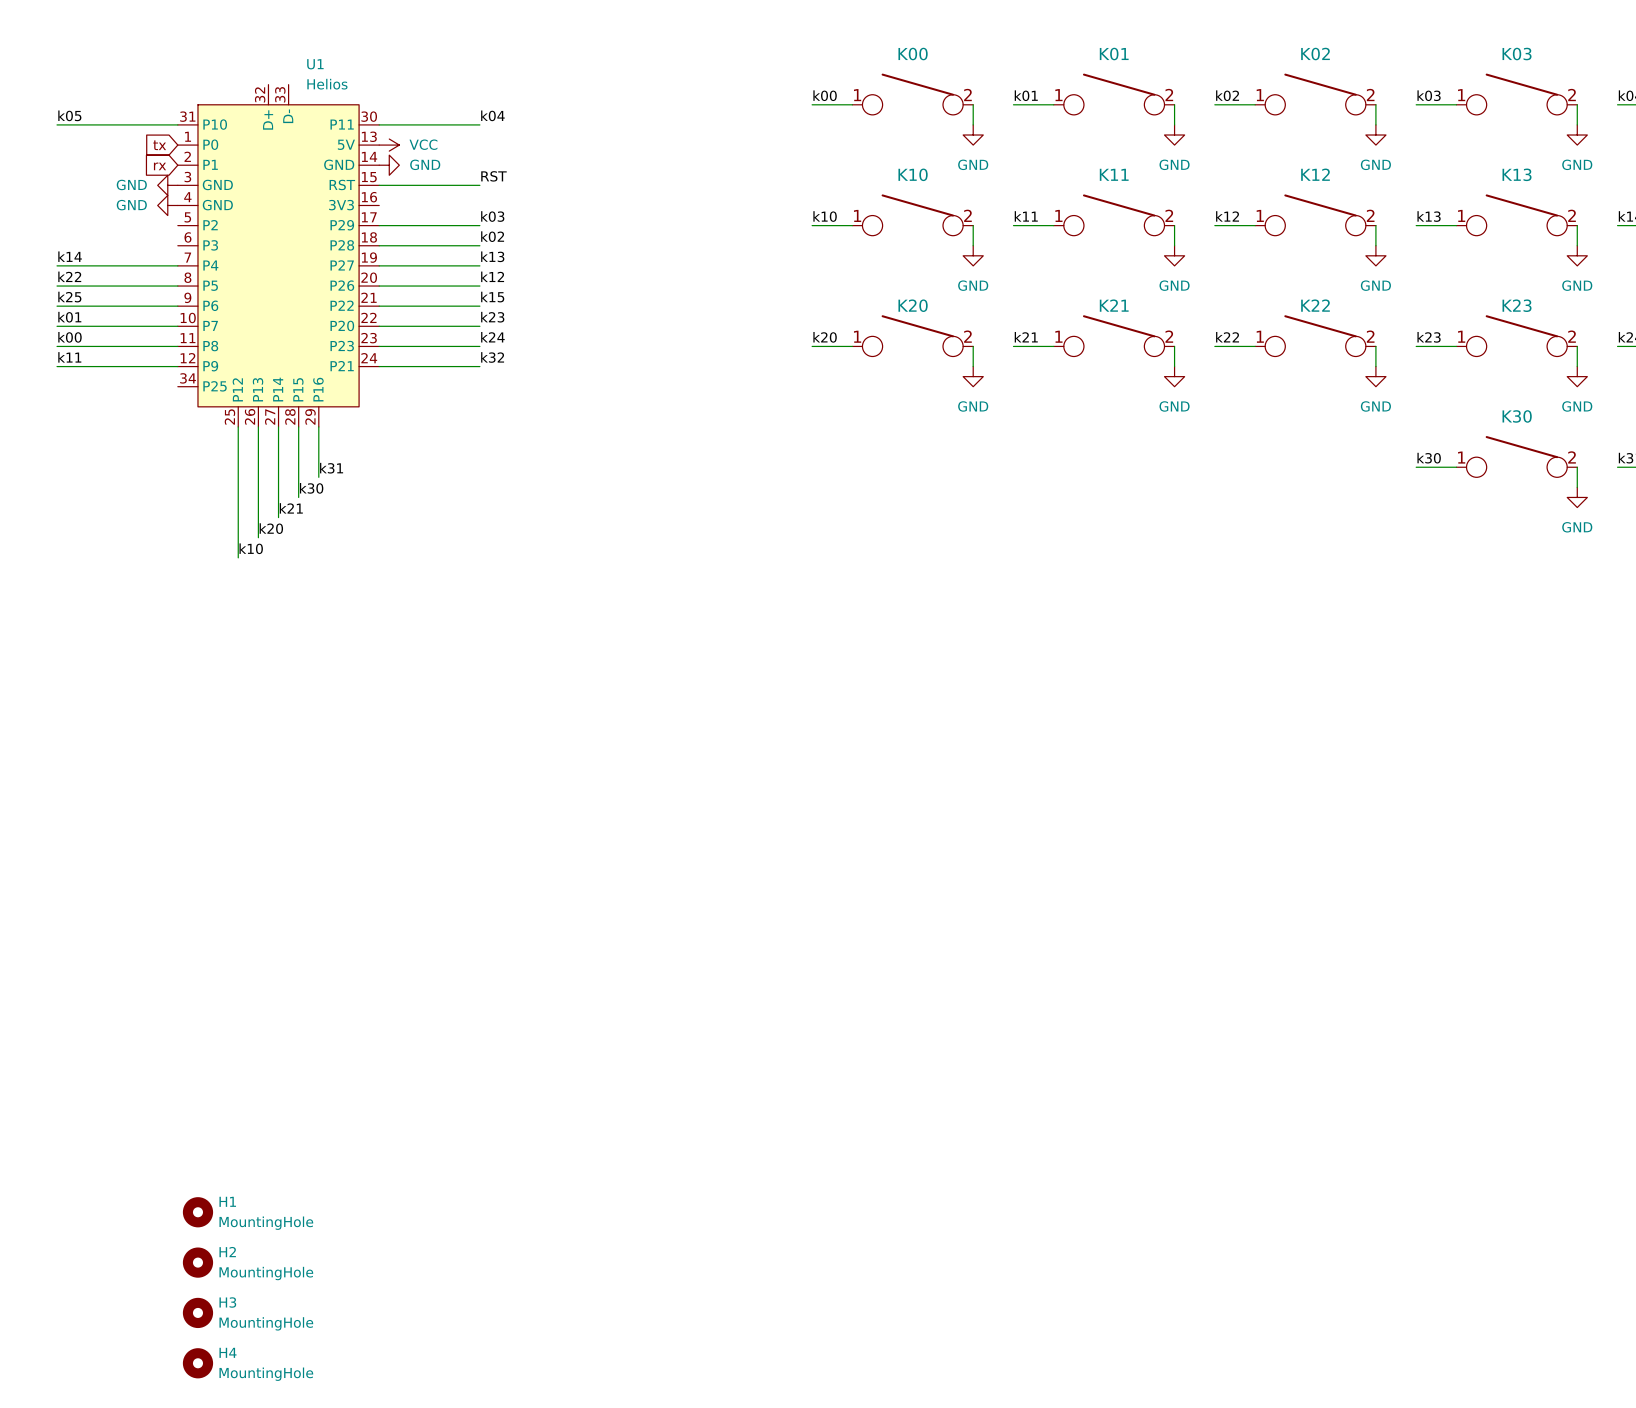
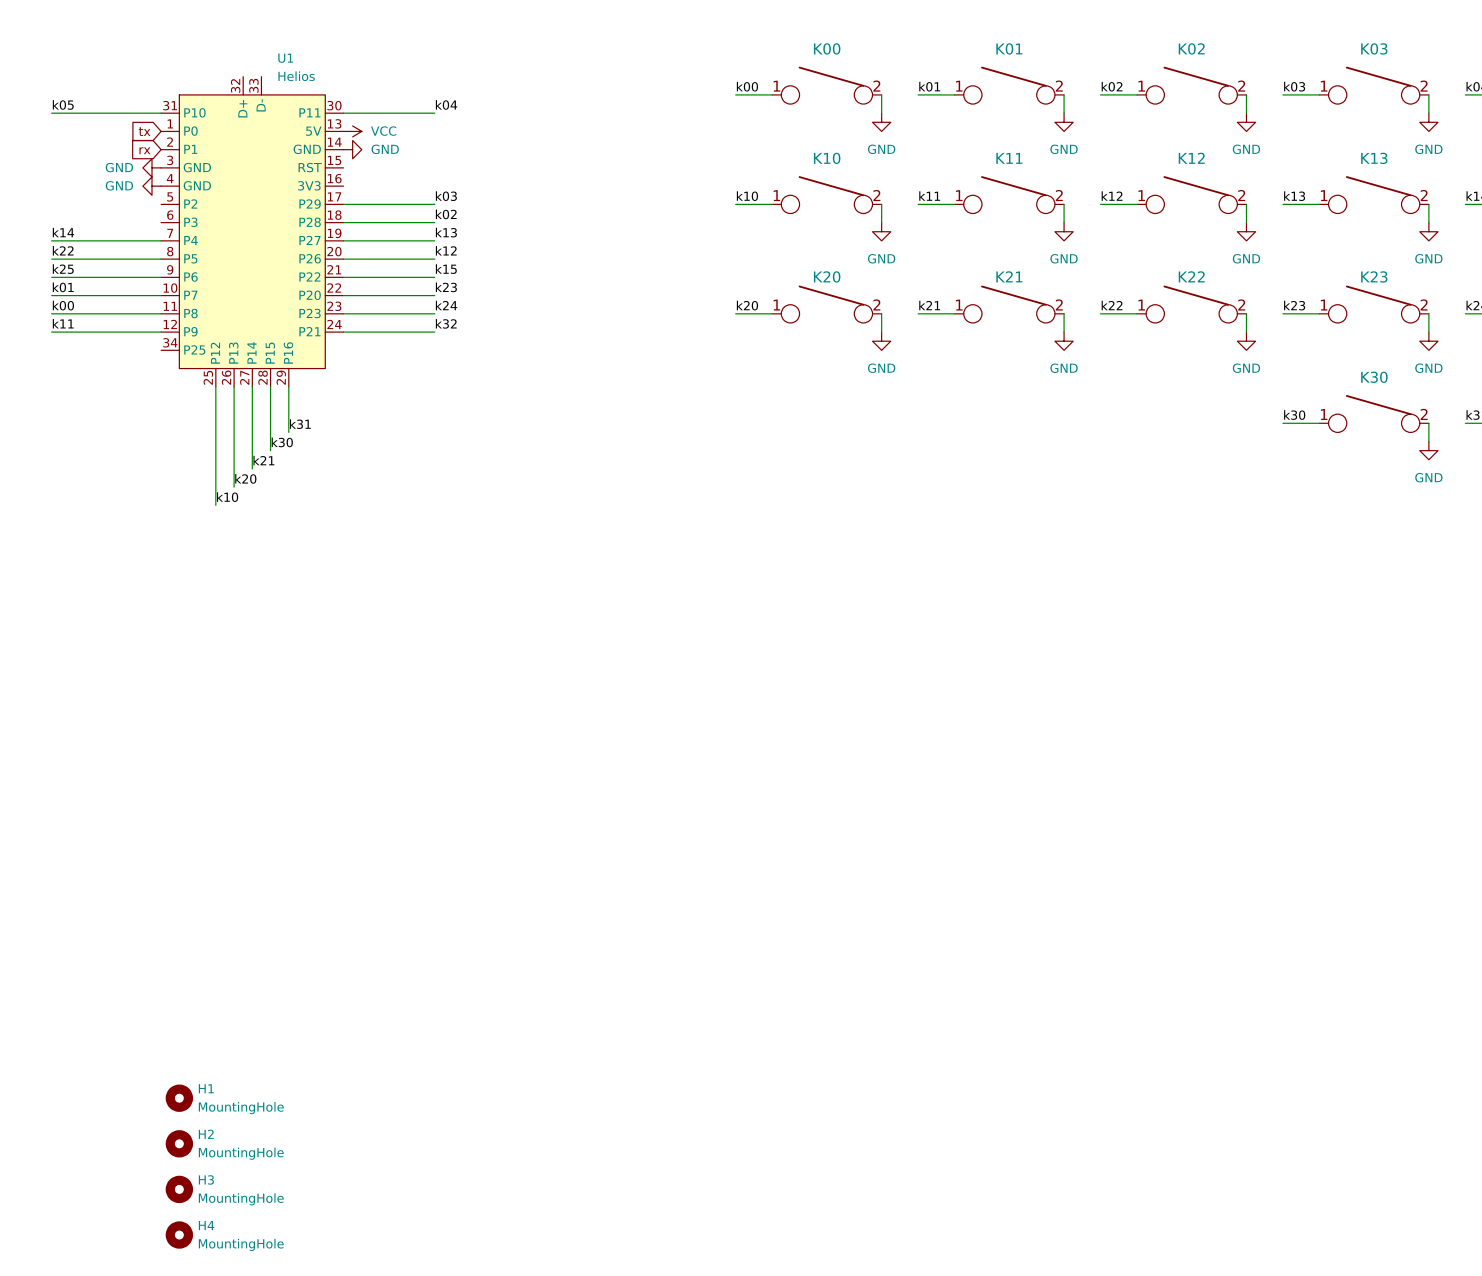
label: RST (493, 176) -> none
wire: (379, 185) (479, 185) -> none

